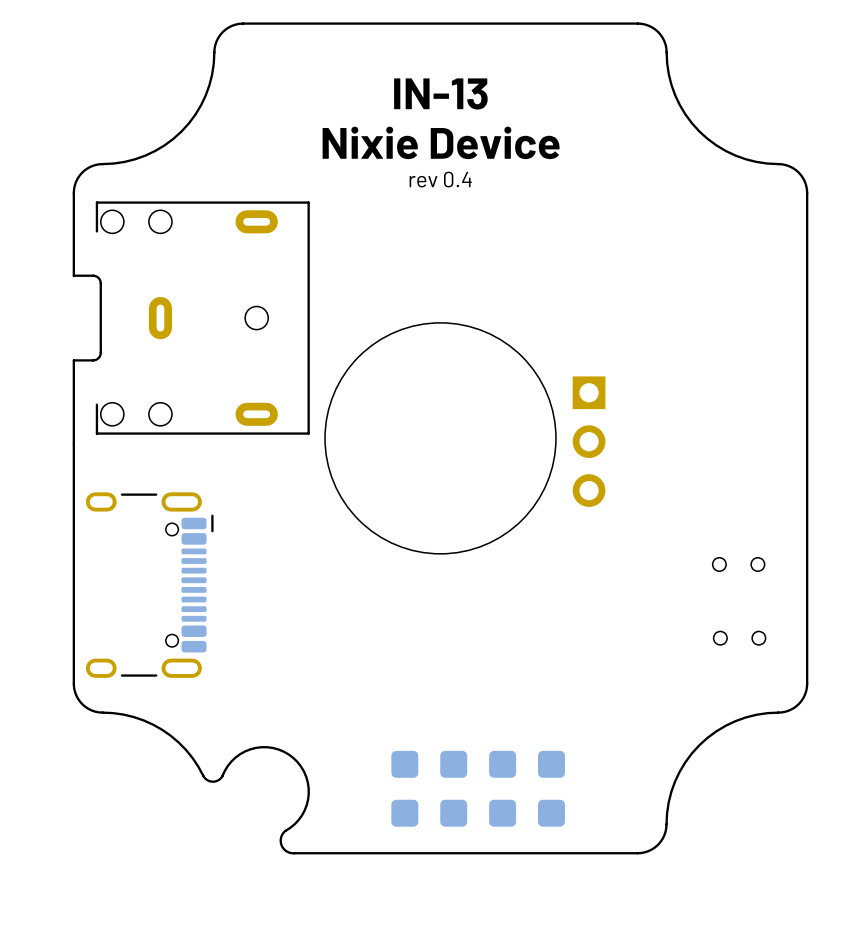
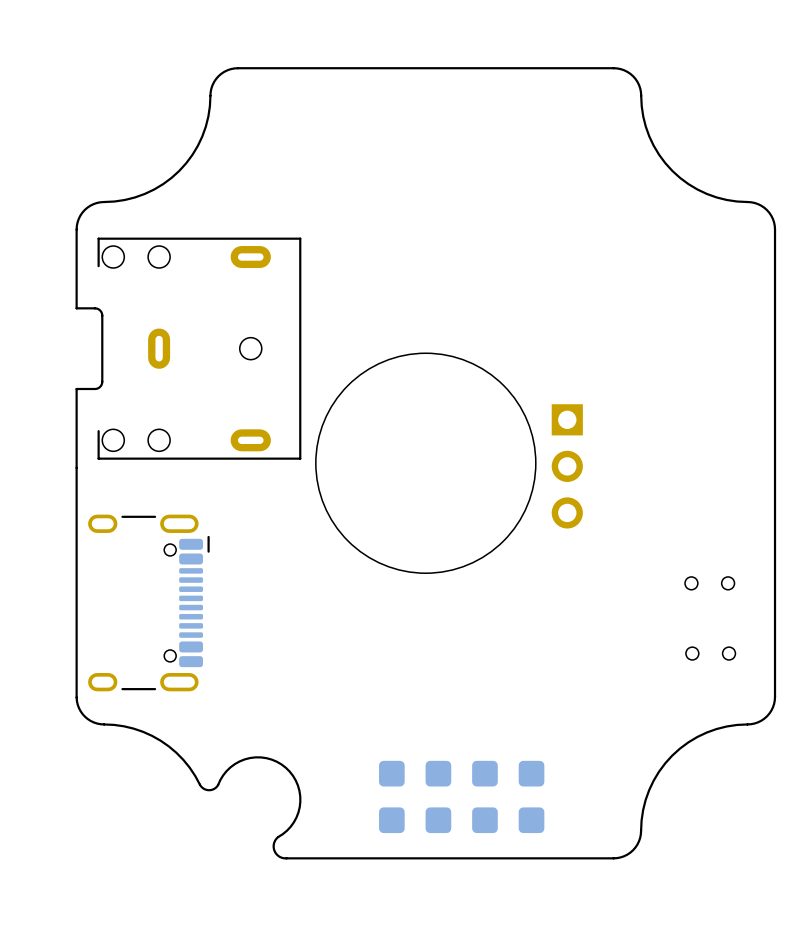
text: IN-13 (440, 93) -> none
text: Nixie Device (441, 142) -> none
text: rev 0.4 (440, 179) -> none

